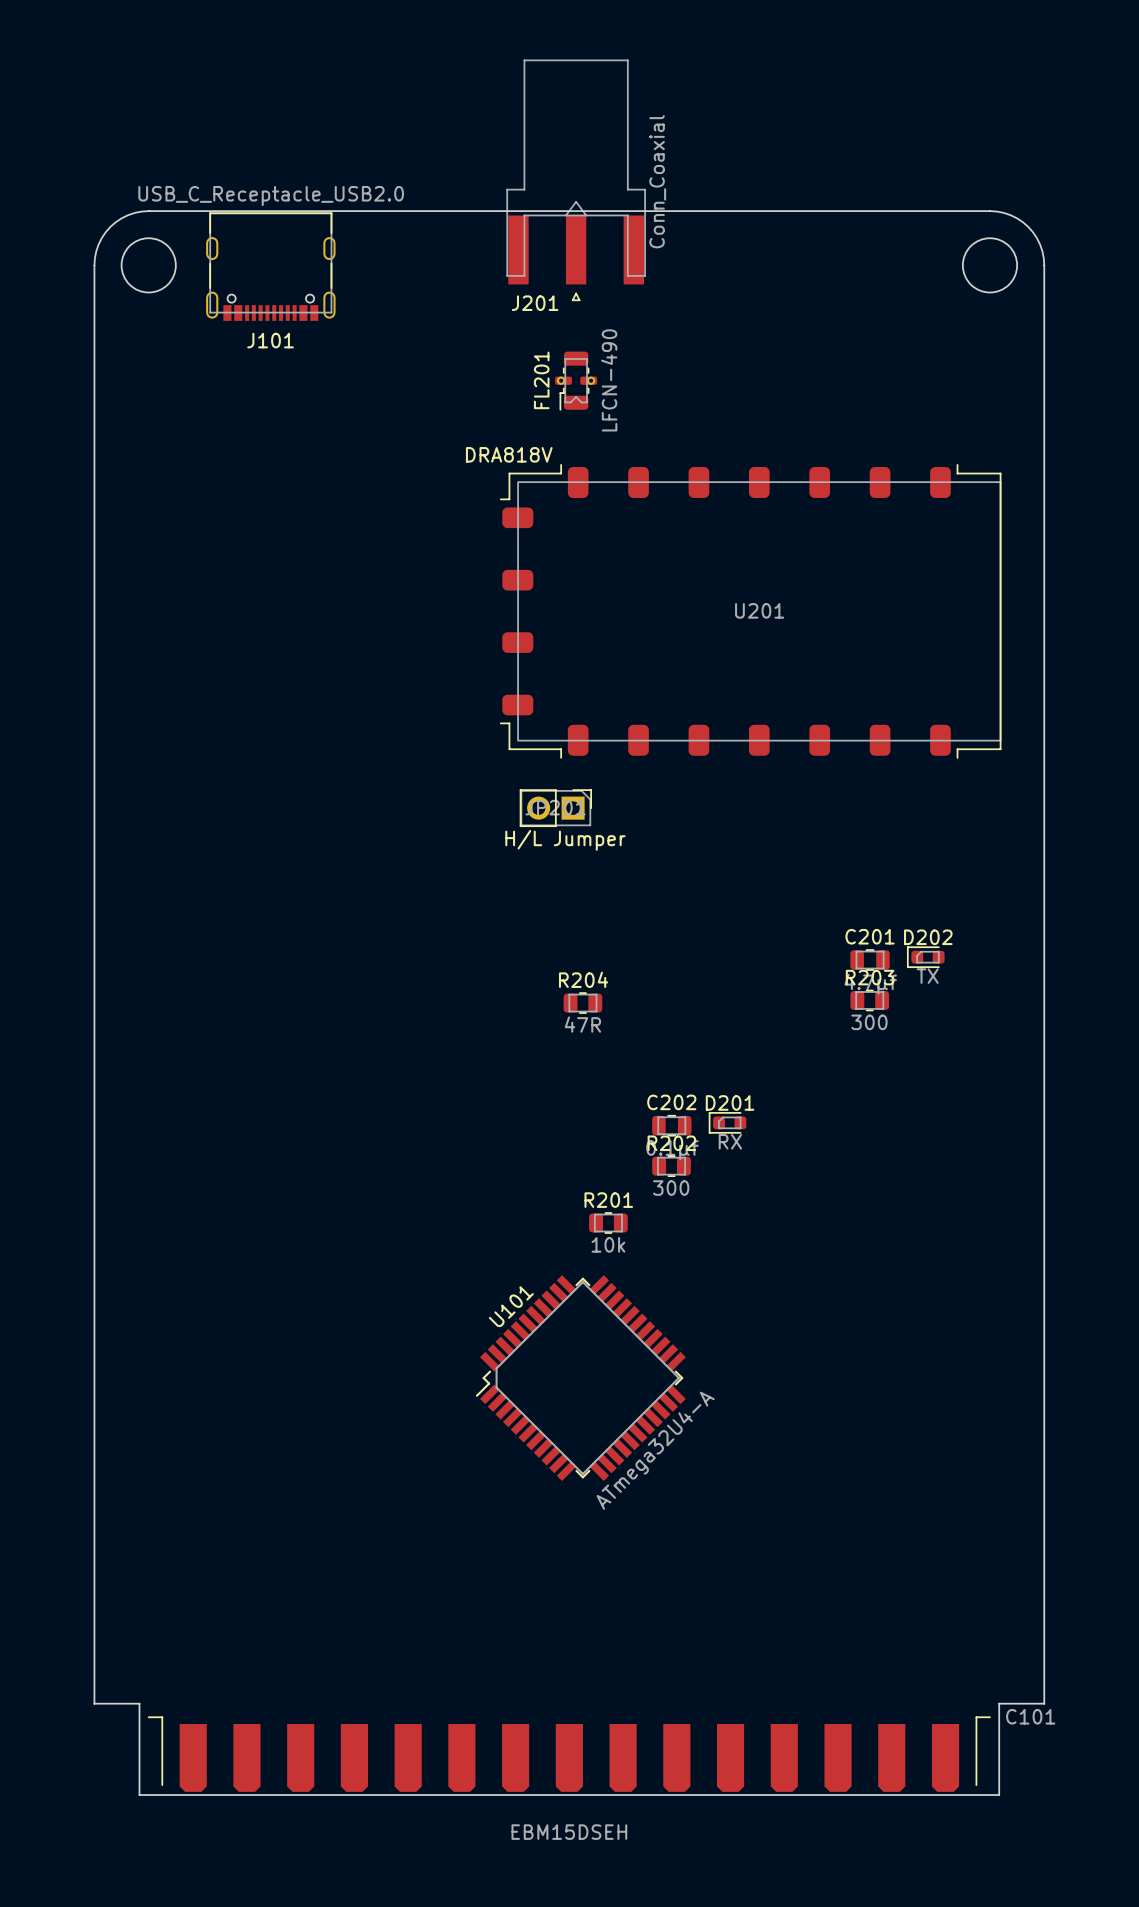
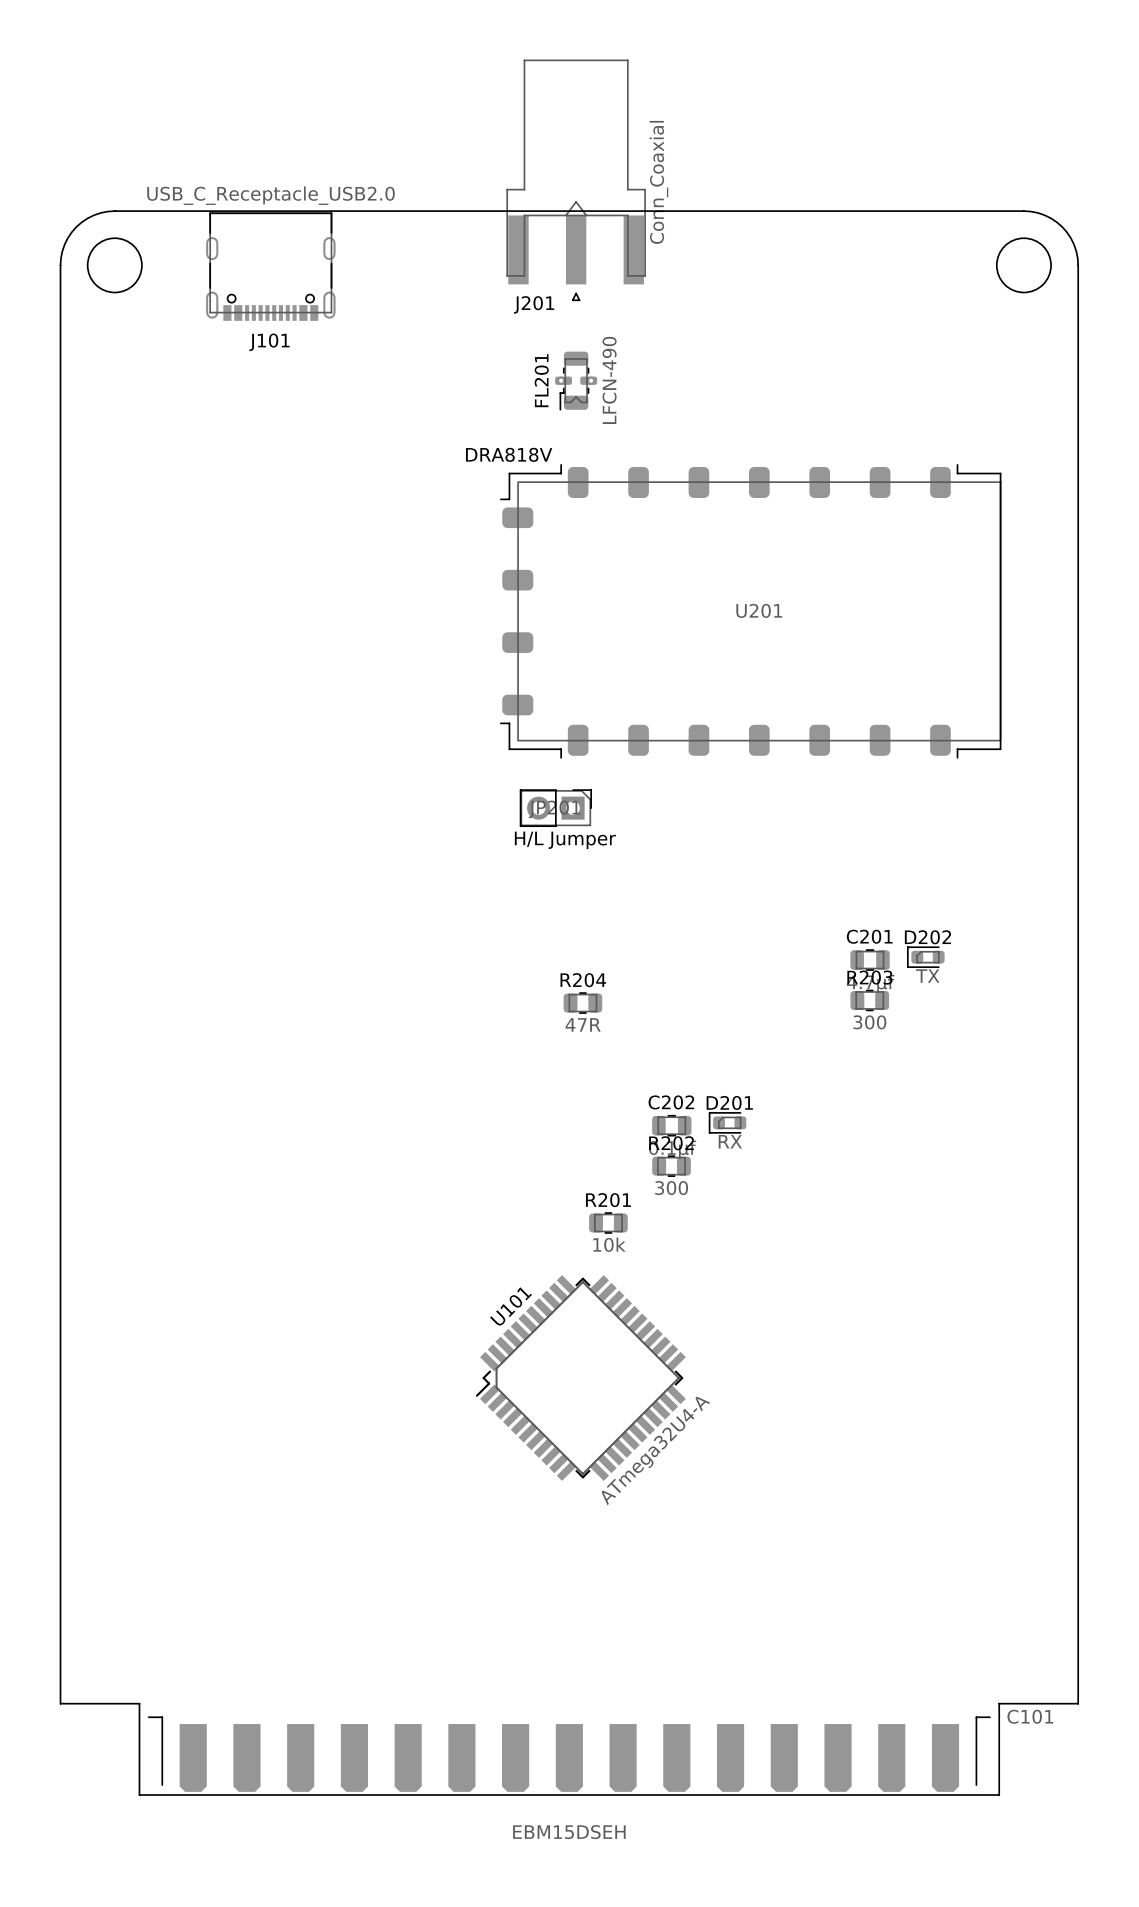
C101 footprint: [93, 210, 1046, 1796] -> [59, 210, 1080, 1796]

